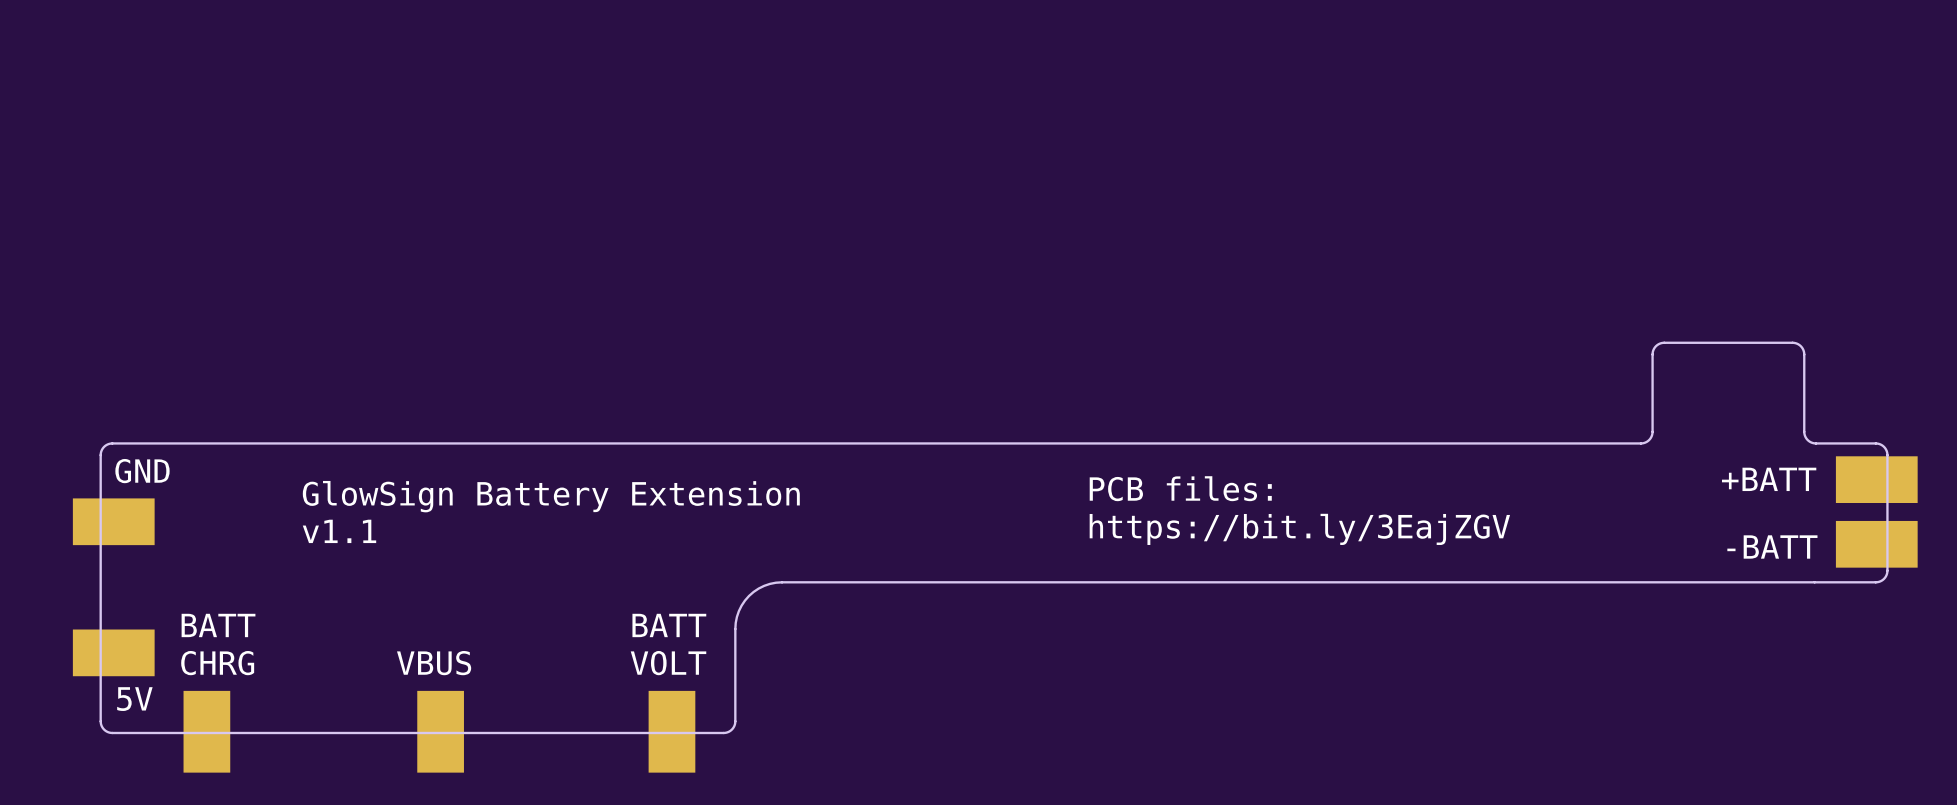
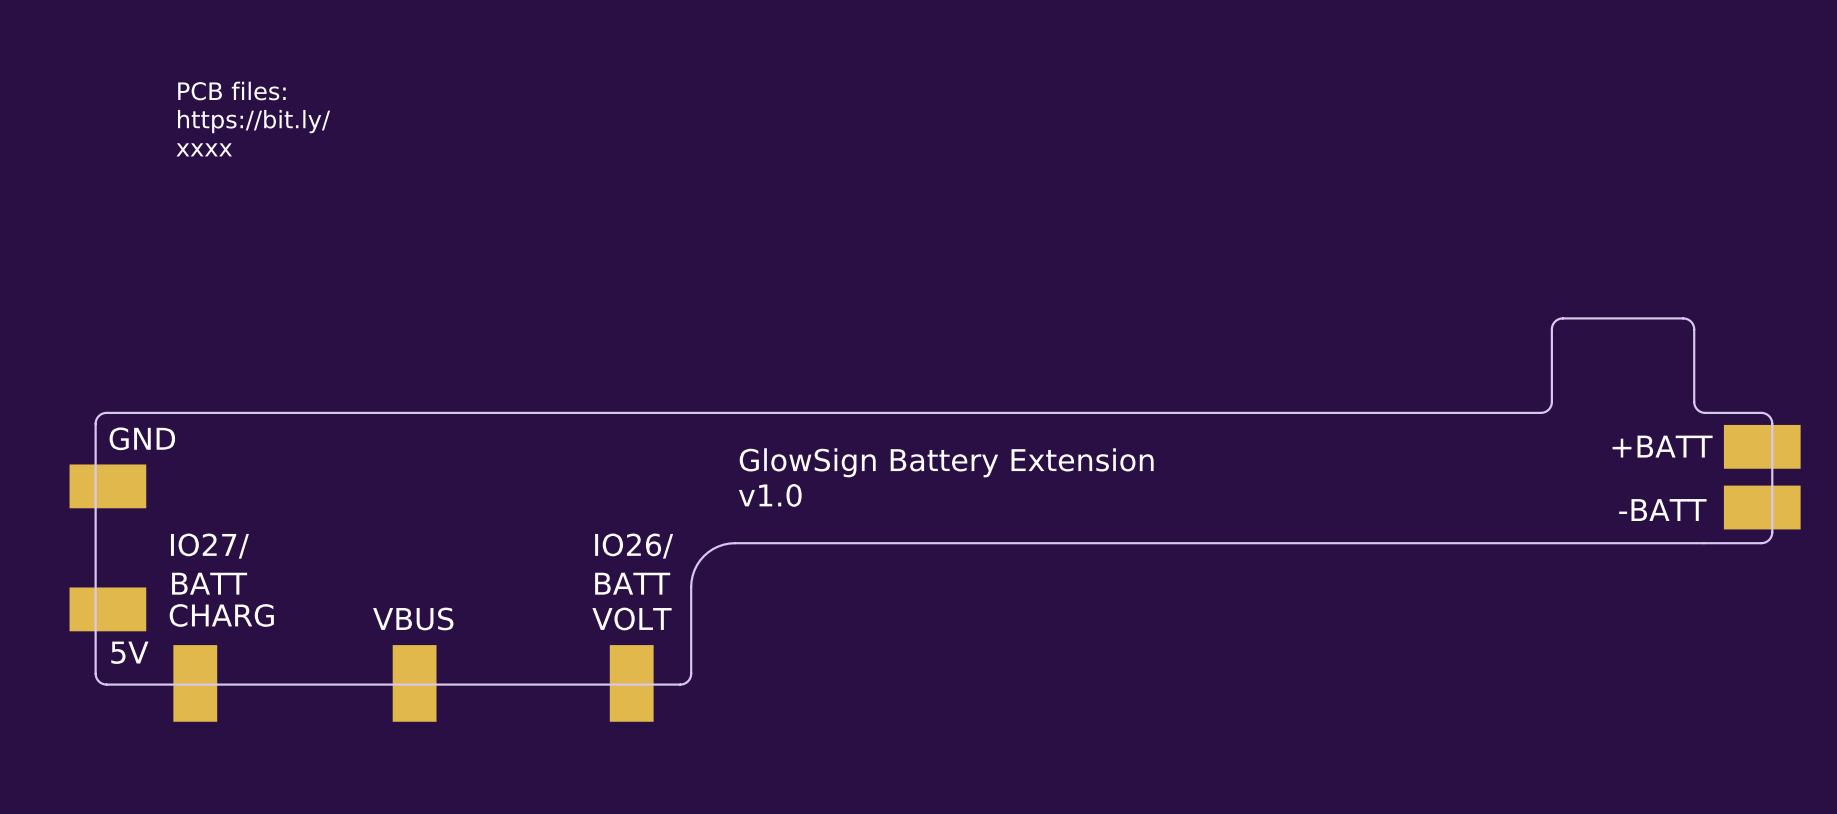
text: none -> PCB files: (231, 91)
text: none -> https://bit.ly/ (254, 121)
text: none -> xxxx (204, 149)
text: PCB files: (1180, 488) -> none
text position: GlowSign Battery Extension (551, 496) -> GlowSign Battery Extension (946, 462)
text: https://bit.ly/3EajZGV (1299, 529) -> none
text: v1.1 (339, 531) -> none
text: none -> v1.0 (770, 495)
text: none -> IO27/ (209, 546)
text: none -> IO26/ (634, 546)
text: CHRG (217, 663) -> CHARG (221, 615)

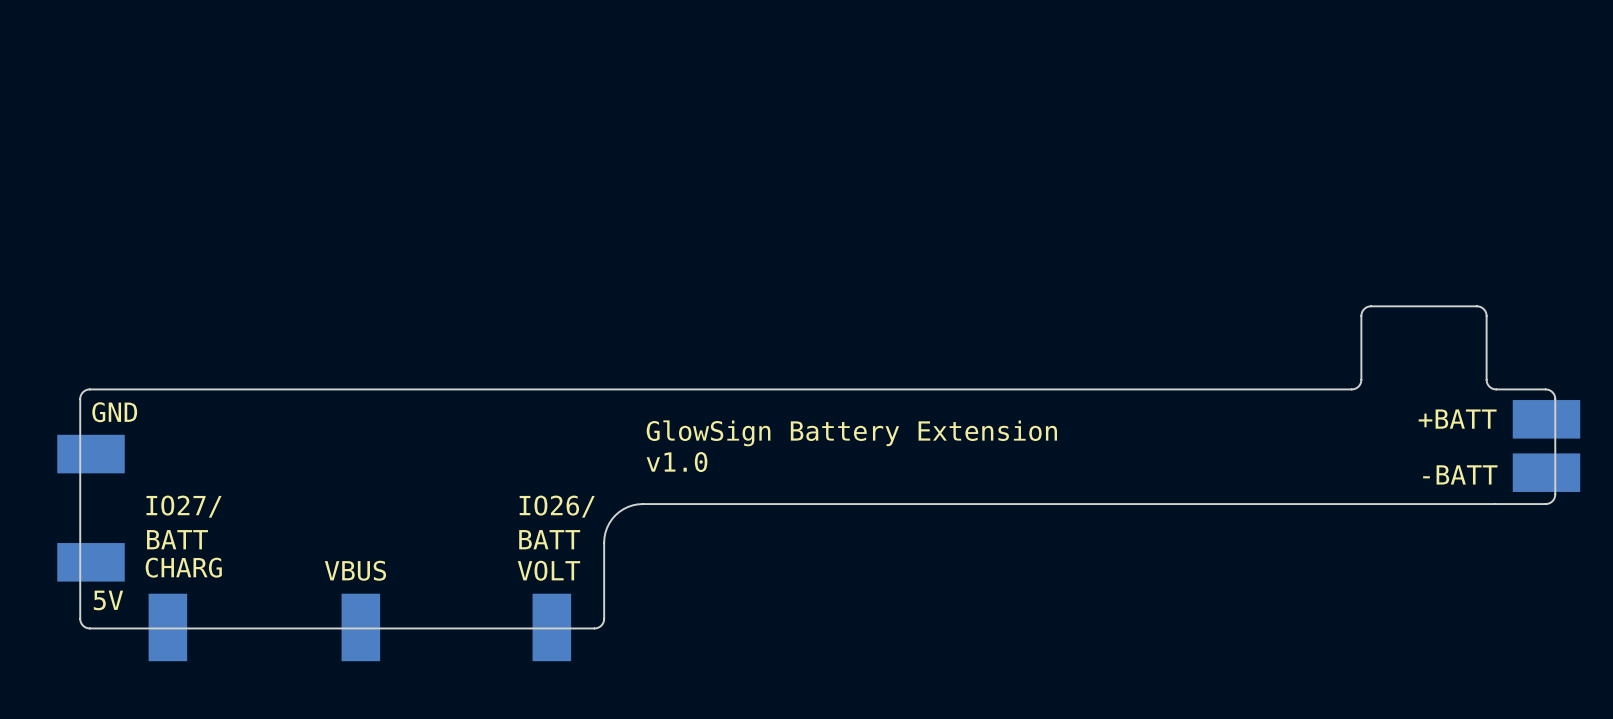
text: PCB files: (231, 91) -> none
text: https://bit.ly/ (254, 121) -> none
text: xxxx (204, 149) -> none

